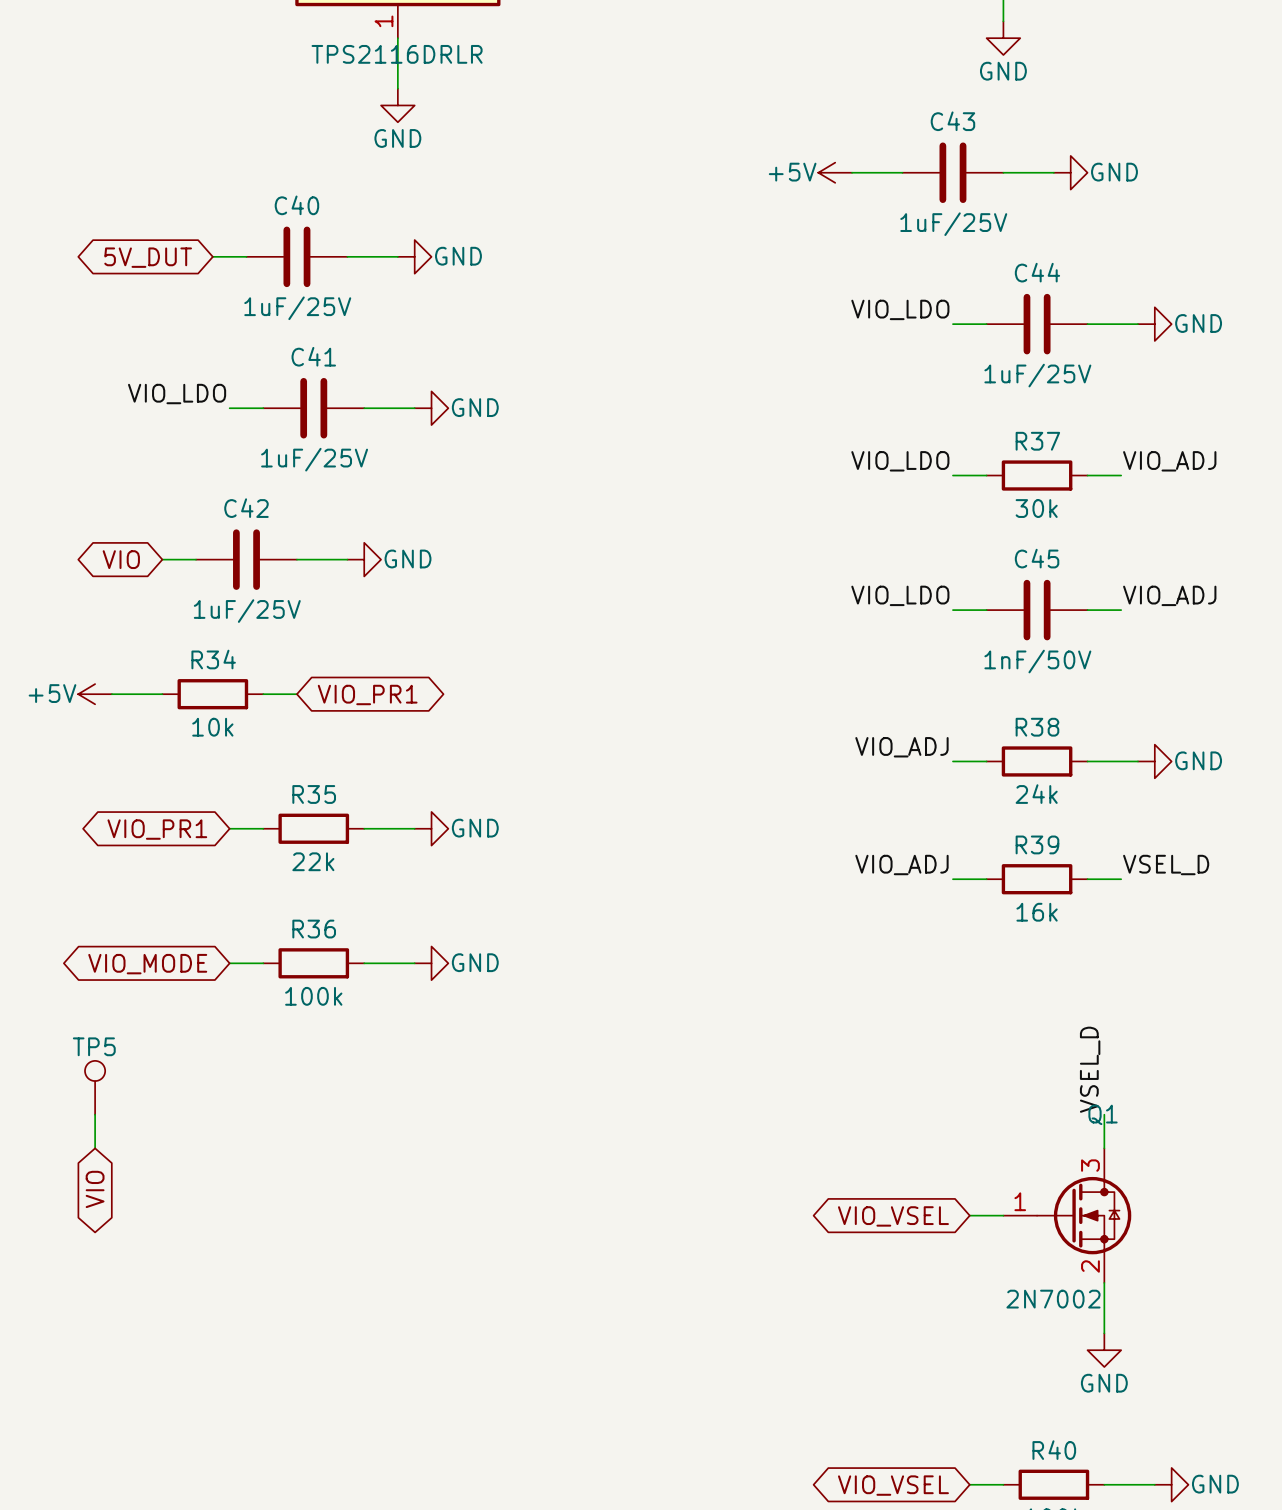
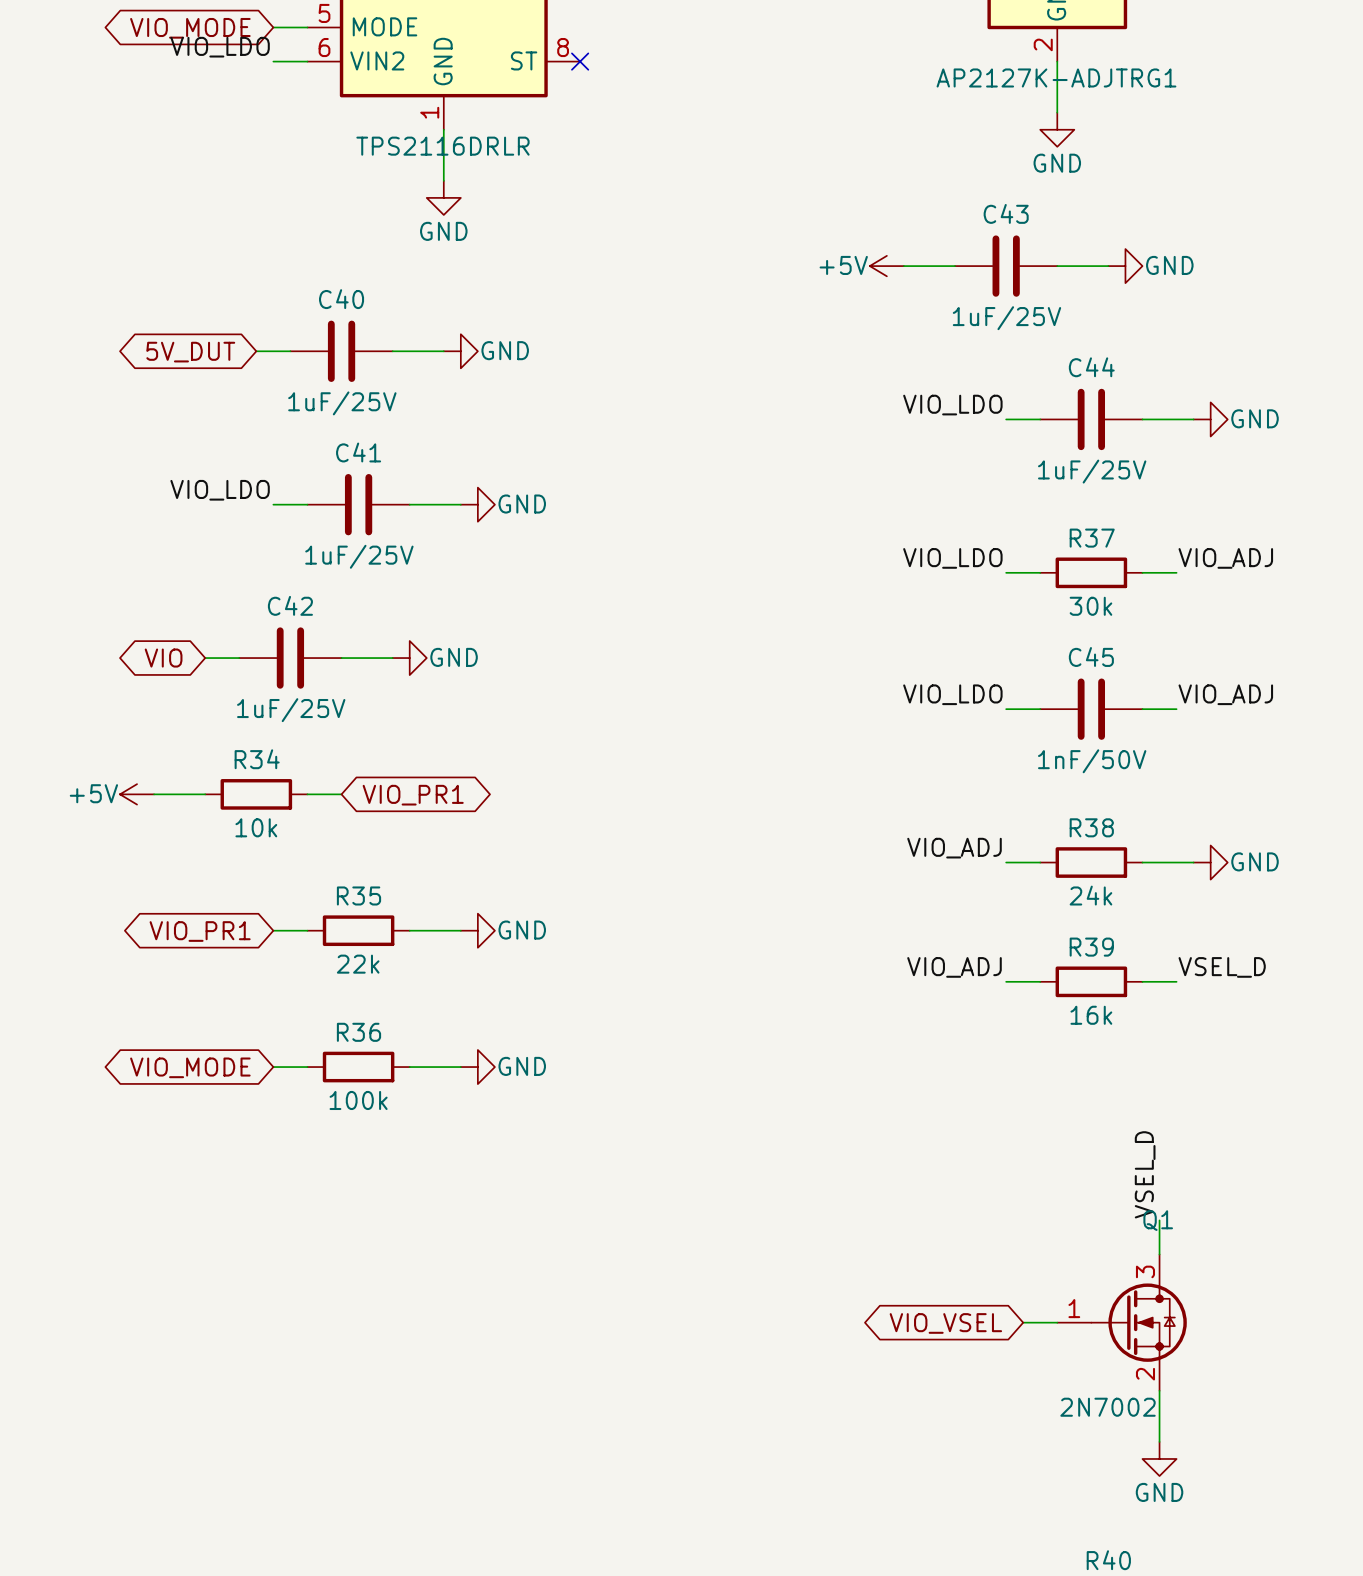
TP5: (95, 1087) -> none
wire: (95, 1114) (95, 1148) -> none
global label: VIO (95, 1189) -> none

